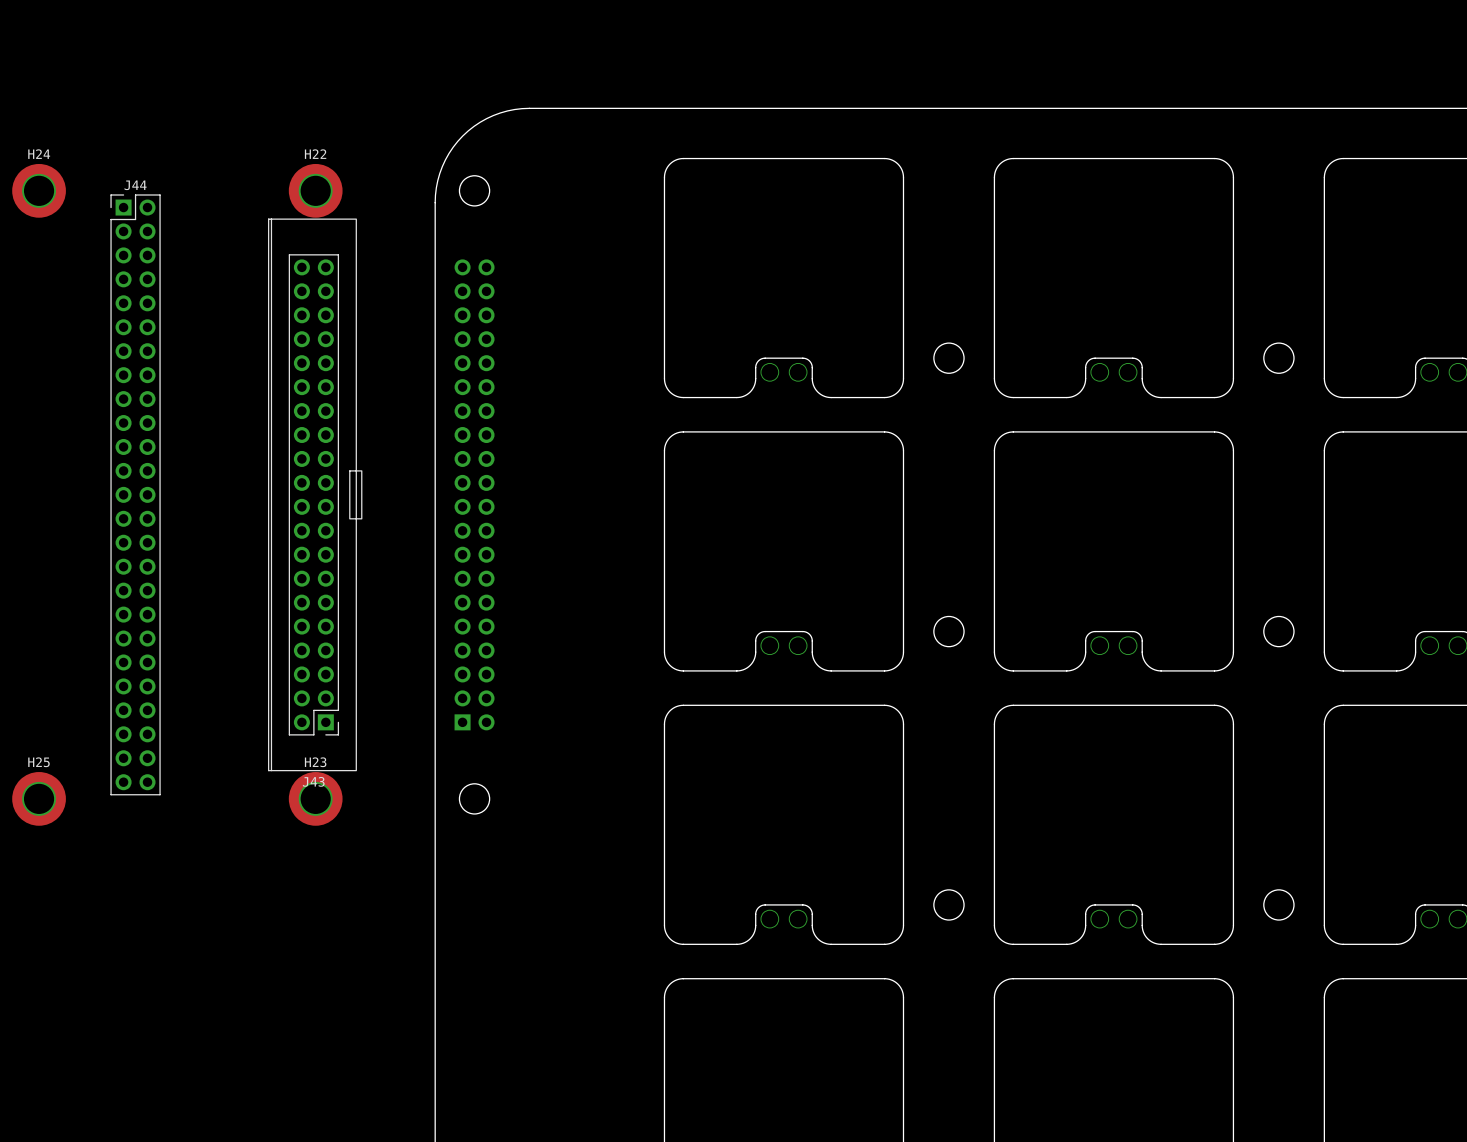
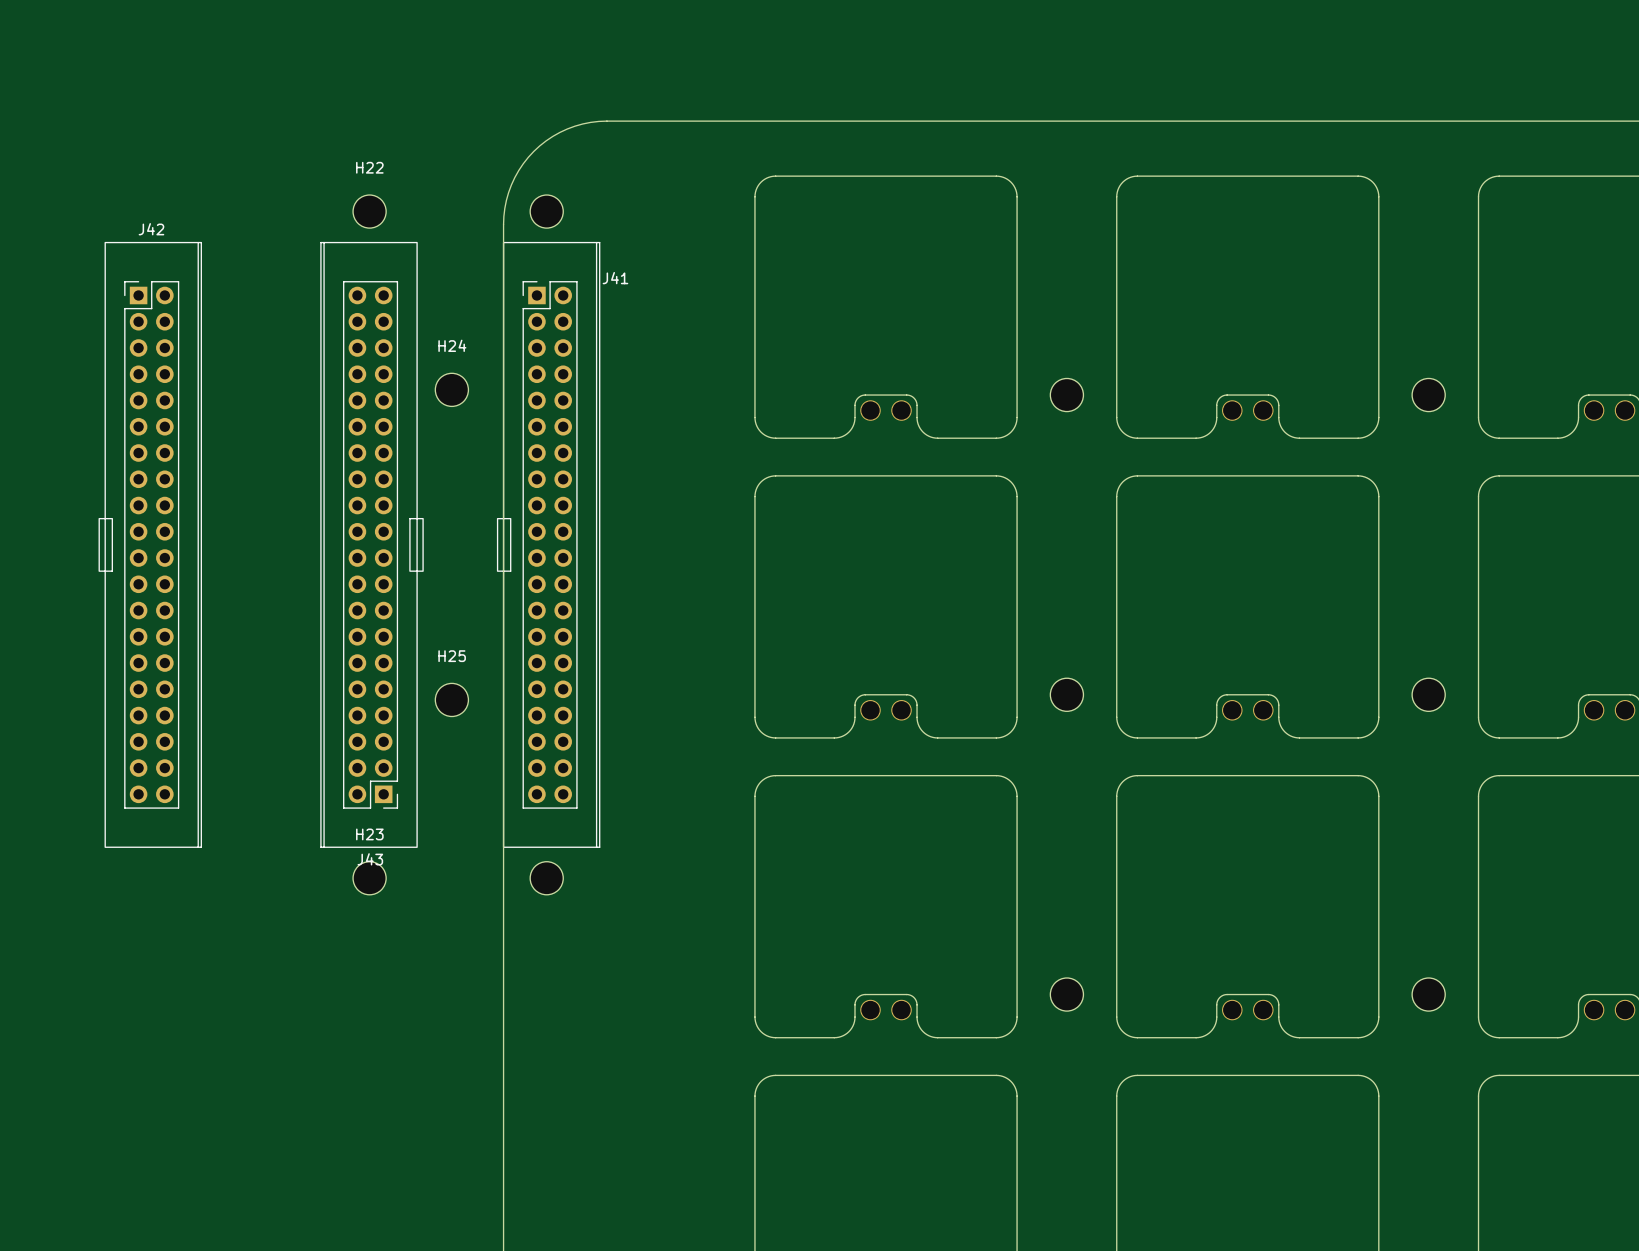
H24 footprint: [12, 163, 66, 218] -> [435, 373, 469, 407]
H22 footprint: [288, 163, 343, 218] -> [353, 195, 387, 229]
J42: none -> (150, 544)
J44: (135, 494) -> none
J41 side: bottom (474, 494) -> top (548, 544)
H25 footprint: [12, 772, 66, 826] -> [435, 683, 469, 717]
H23 footprint: [288, 772, 343, 826] -> [353, 861, 387, 895]

